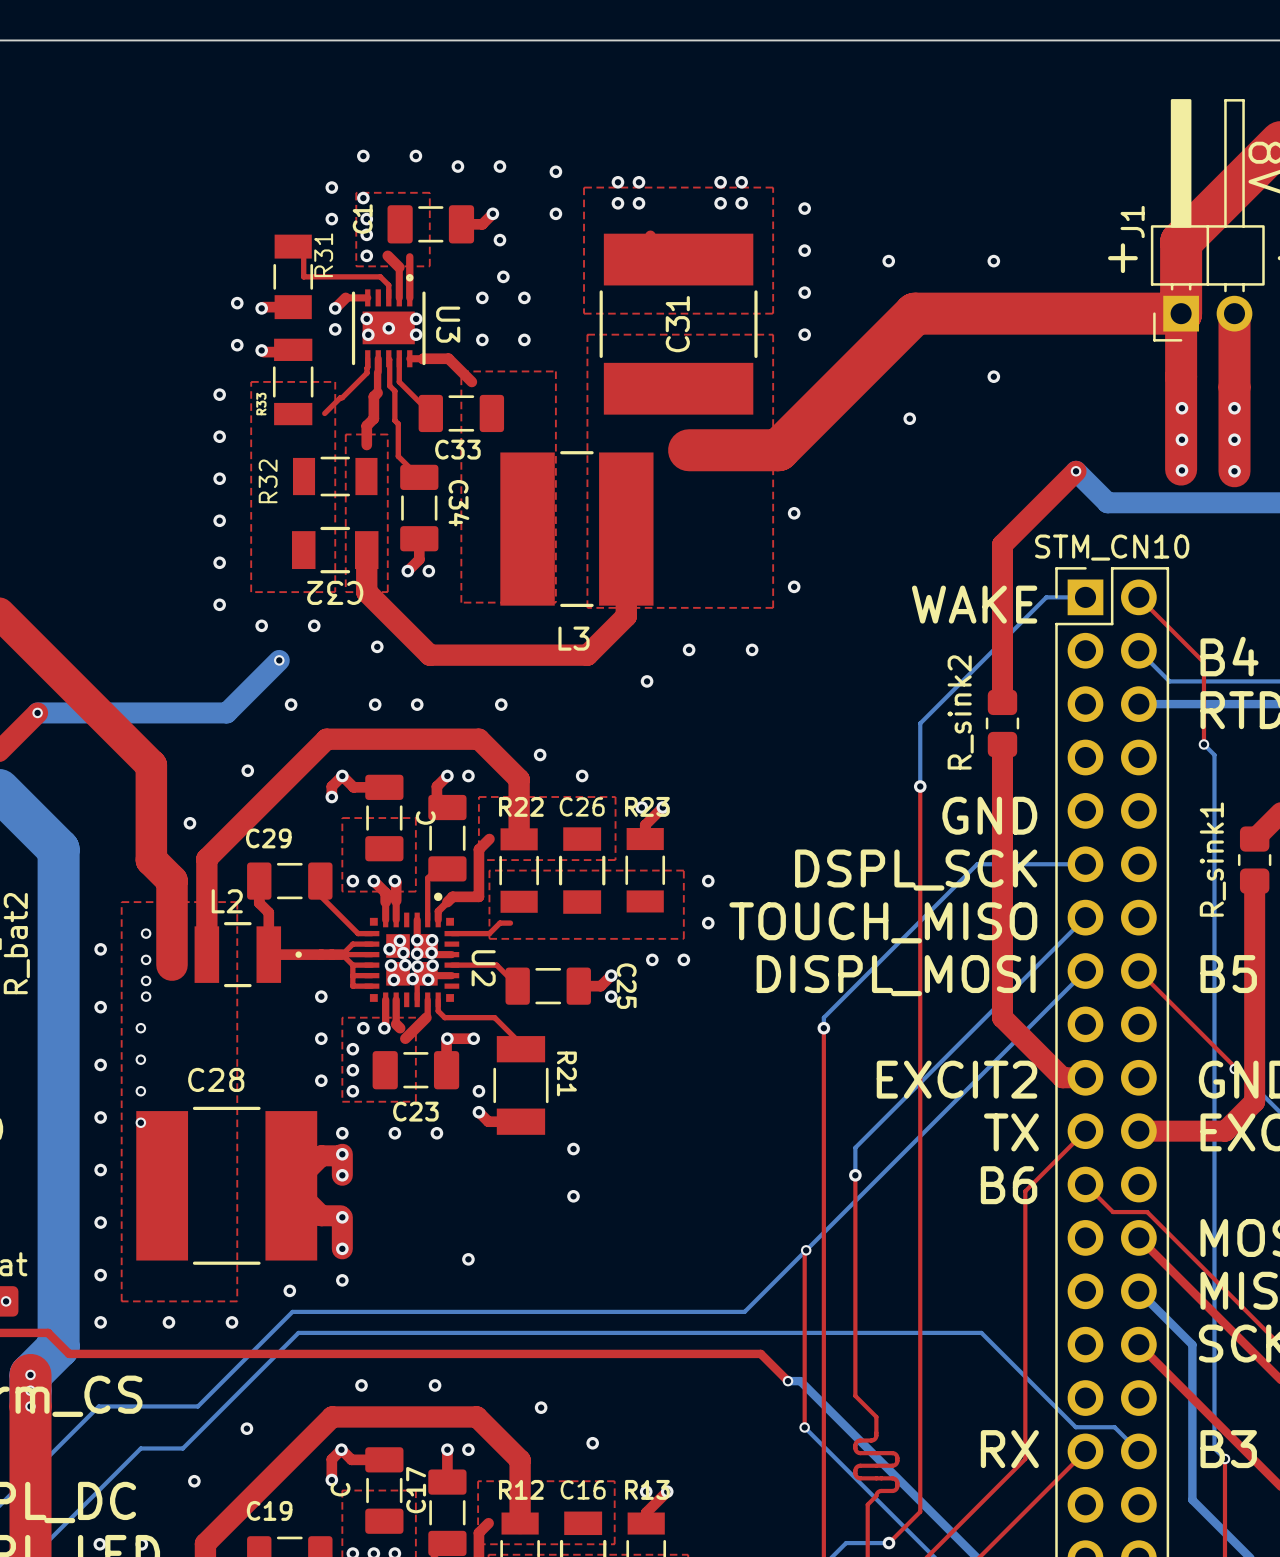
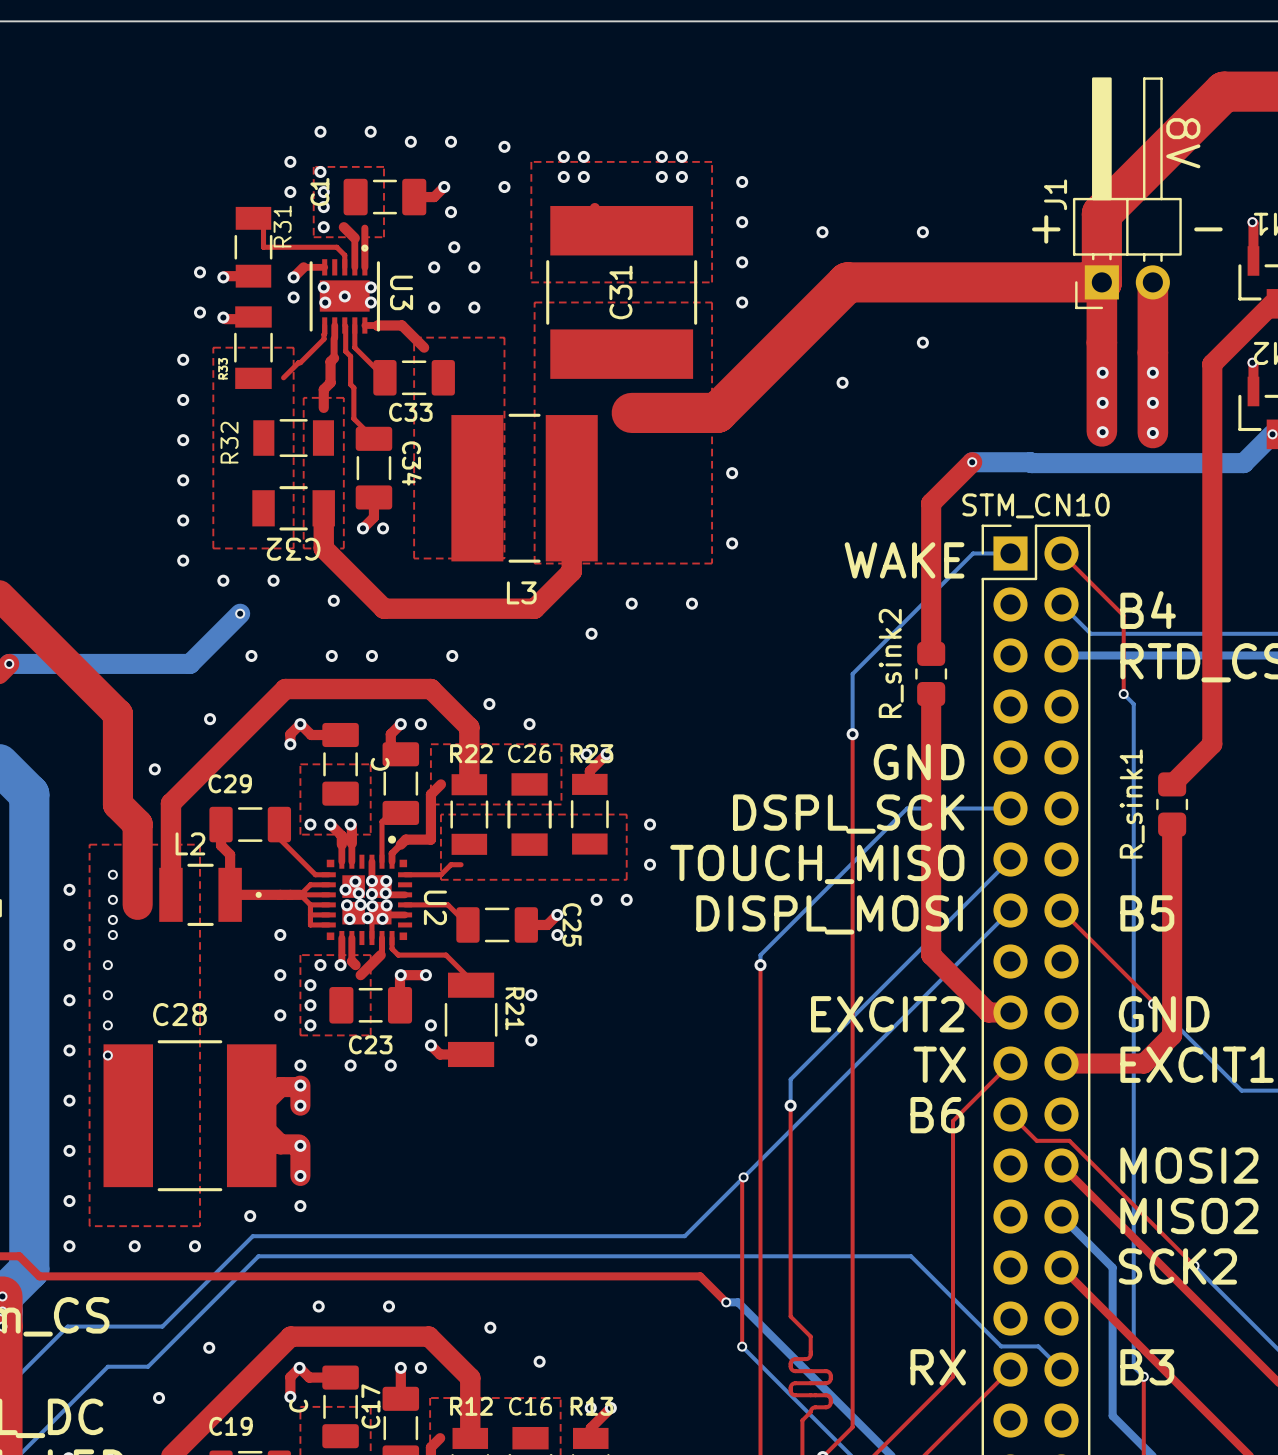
top track: (1076, 471) (1045, 501) -> none
bottom track: (1076, 471) (1106, 501) -> (972, 462) (1030, 462)
via position: (1076, 471) -> (972, 462)
via: none -> (531, 995)
via position: (573, 1149) -> (531, 1040)
via: (573, 1196) -> none
via: (468, 1259) -> none

